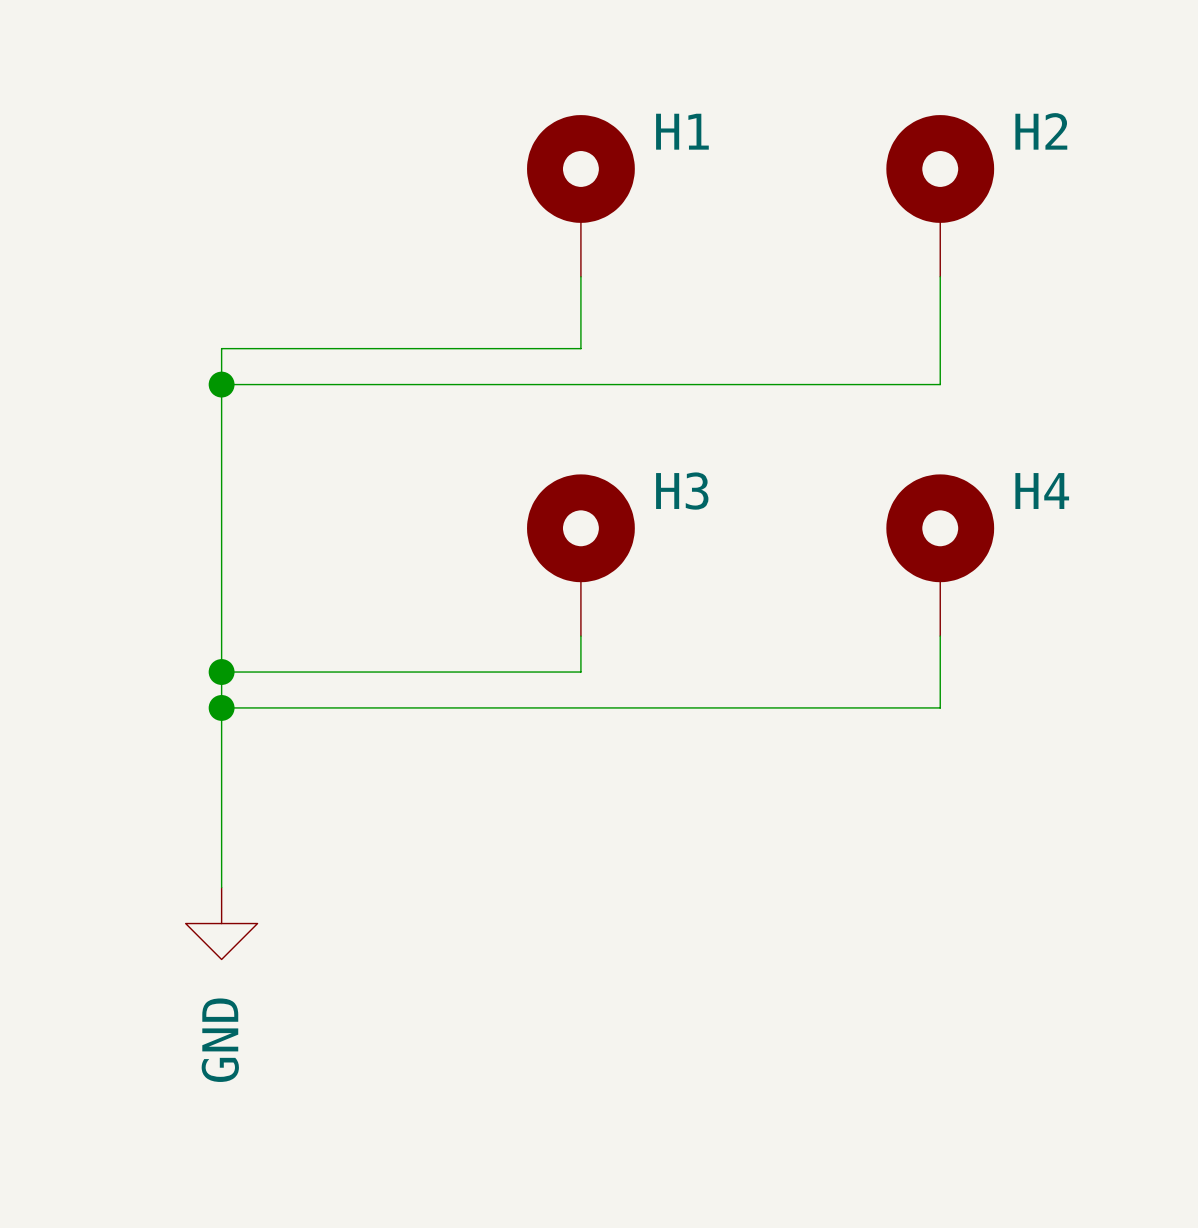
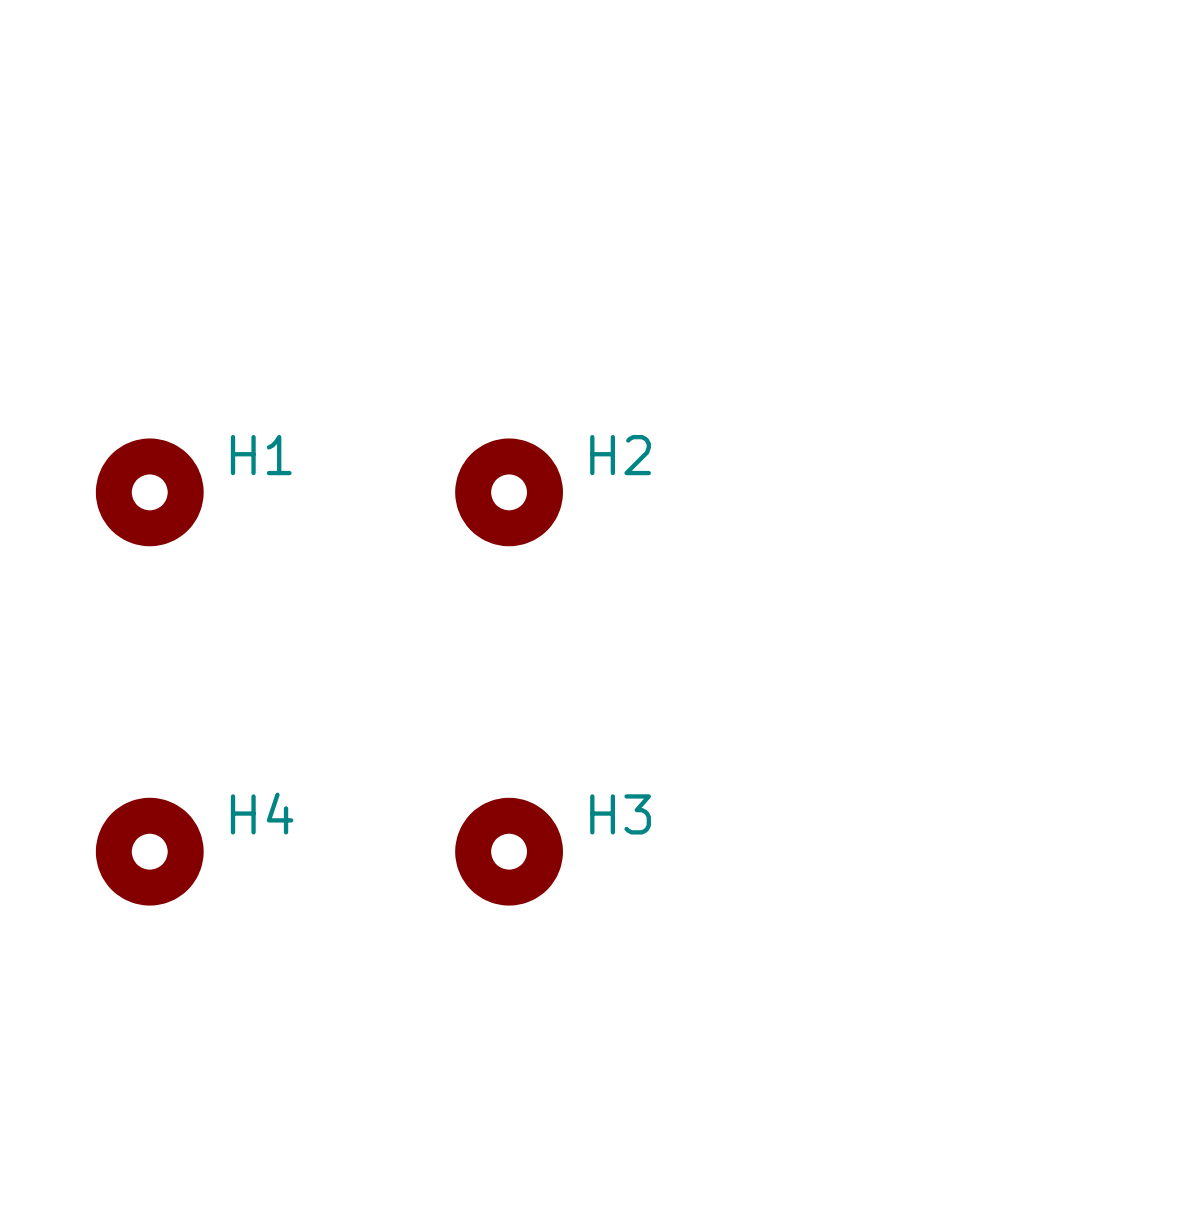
H1 symbol: [527, 115, 635, 277] -> [95, 438, 204, 547]
H2 symbol: [886, 115, 995, 277] -> [455, 438, 563, 547]
wire: (580, 276) (580, 348) (221, 348) (221, 887) -> none
wire: (940, 276) (940, 384) (221, 384) -> none
junction: (221, 384) -> none
H3 symbol: [527, 474, 635, 637] -> [455, 797, 563, 906]
H4 symbol: [886, 474, 995, 637] -> [95, 797, 204, 906]
wire: (580, 636) (580, 672) (221, 672) -> none
wire: (940, 636) (940, 707) (221, 707) -> none
junction: (221, 672) -> none
junction: (221, 707) -> none
power symbol: GND (221, 923) -> none

